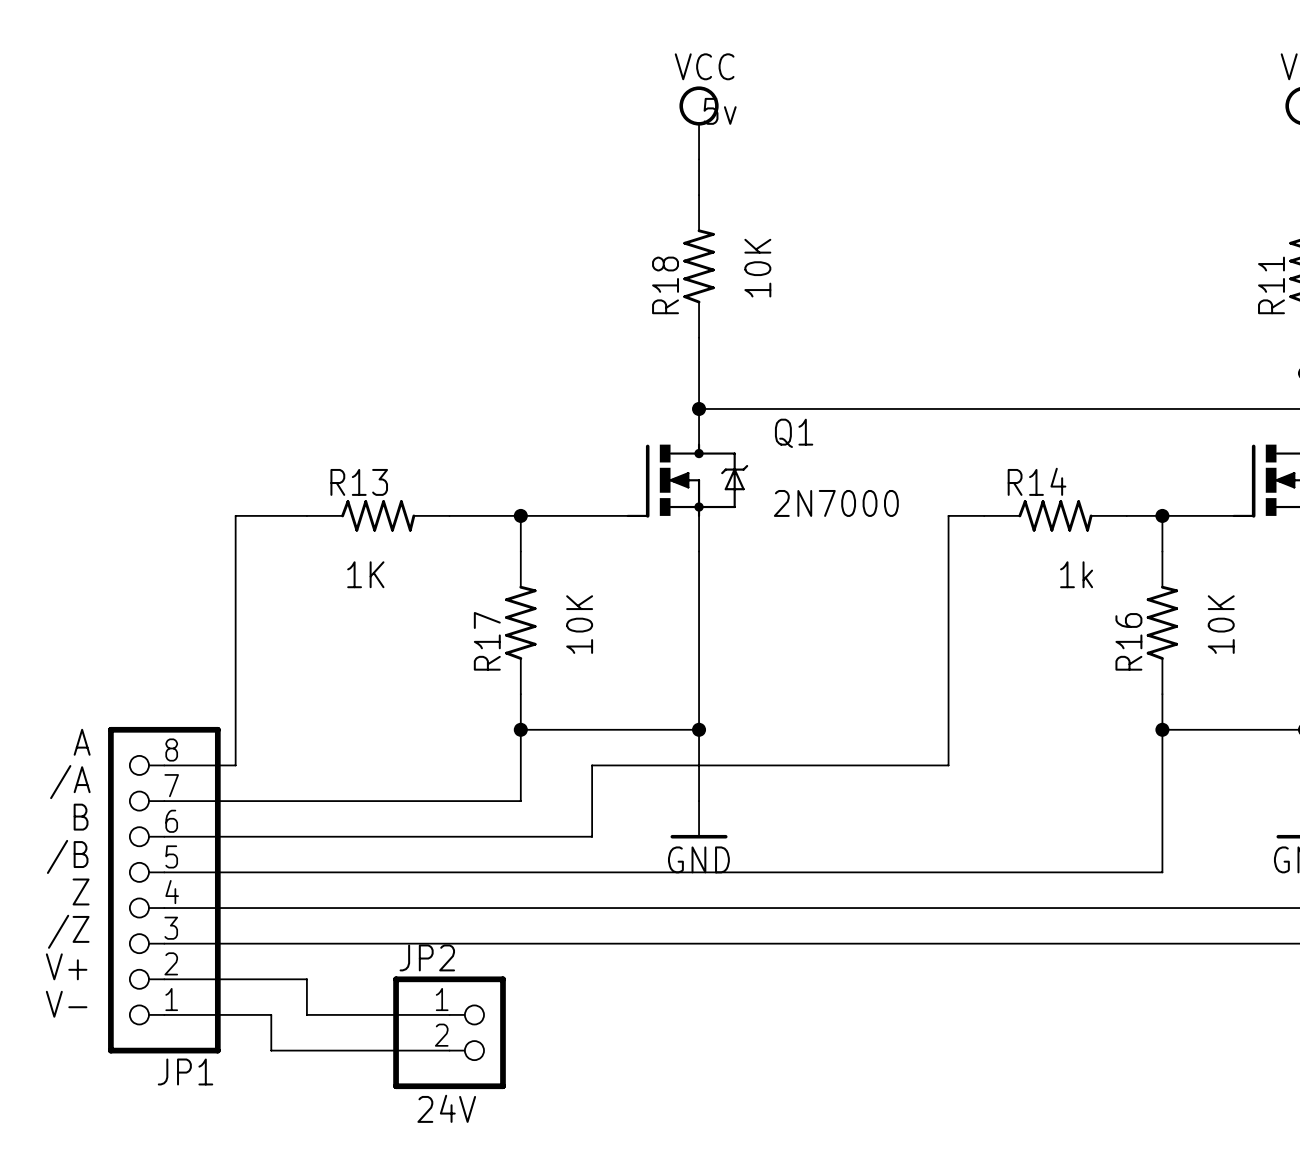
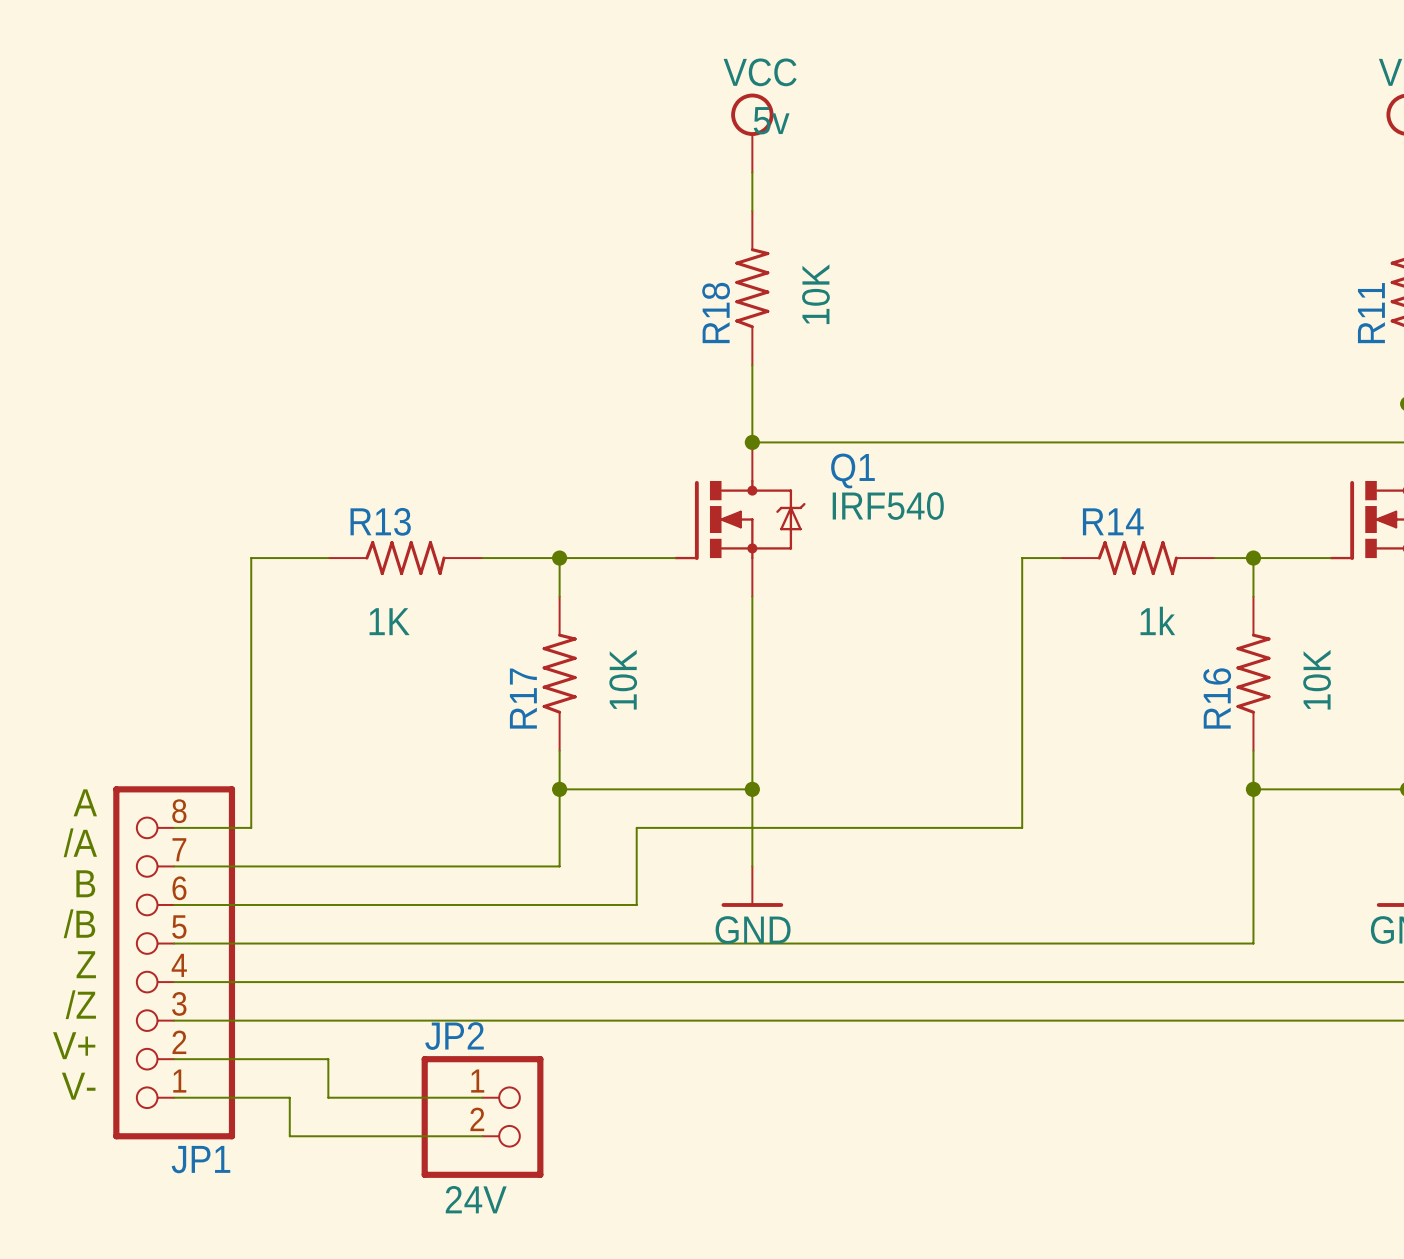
Q1 value: none -> IRF540 (888, 506)
Q1 text: 2N7000 (836, 503) -> none

